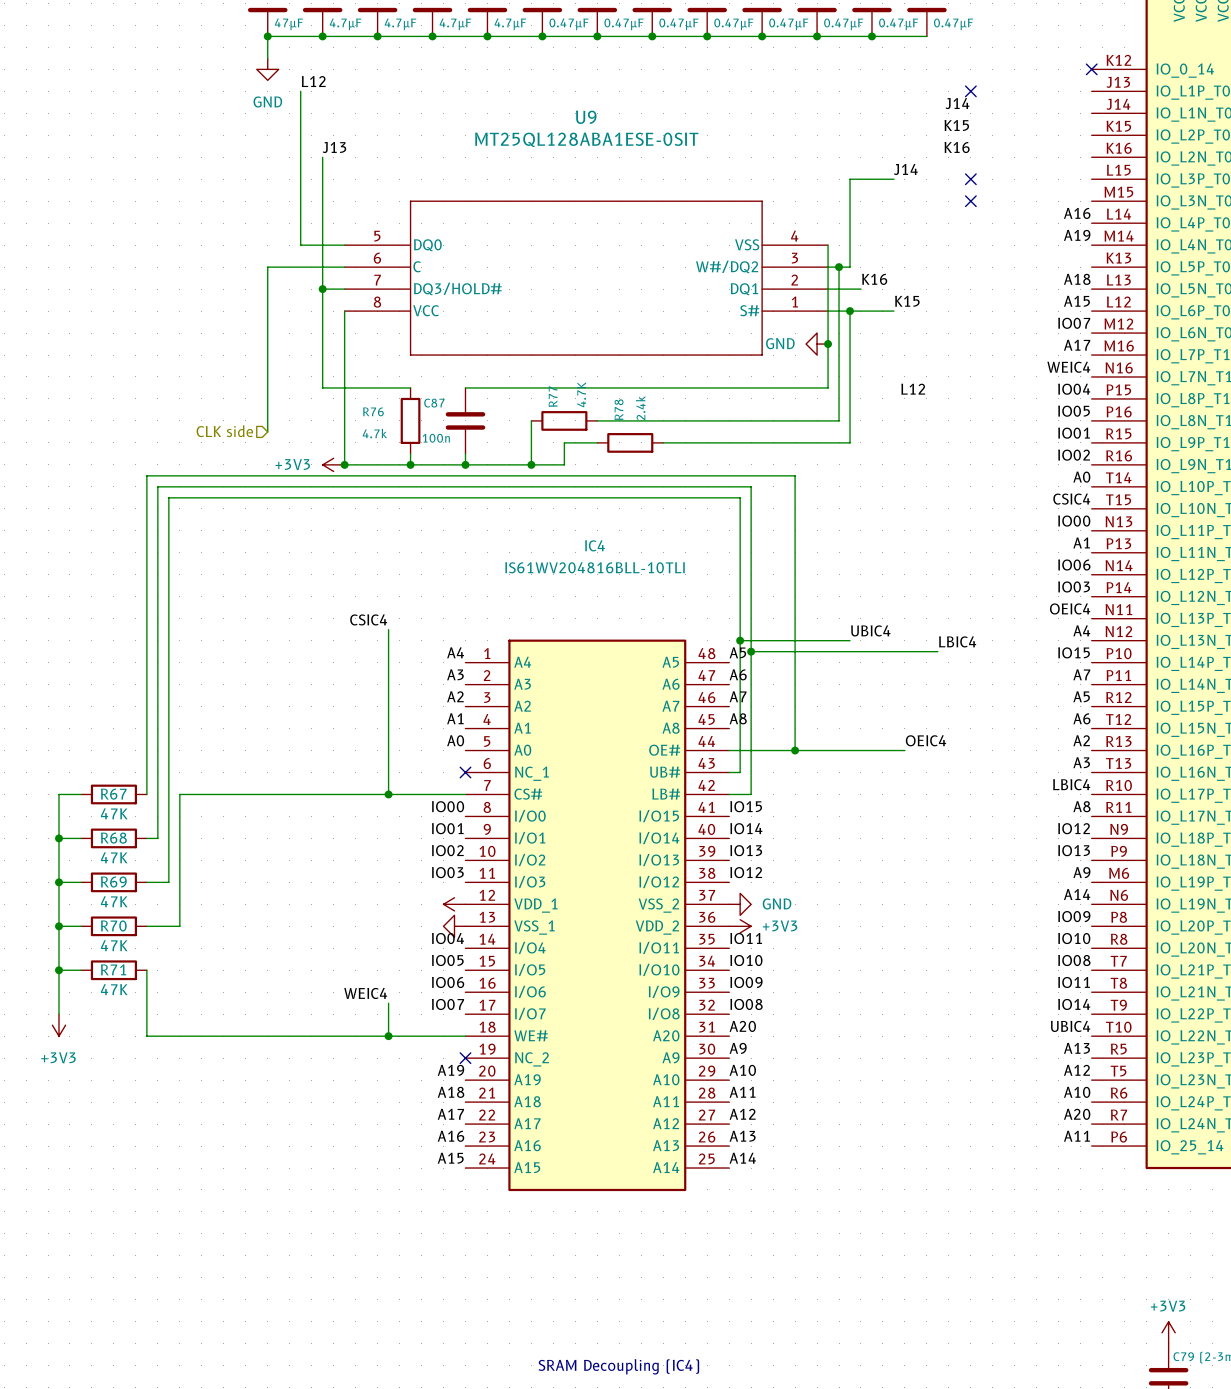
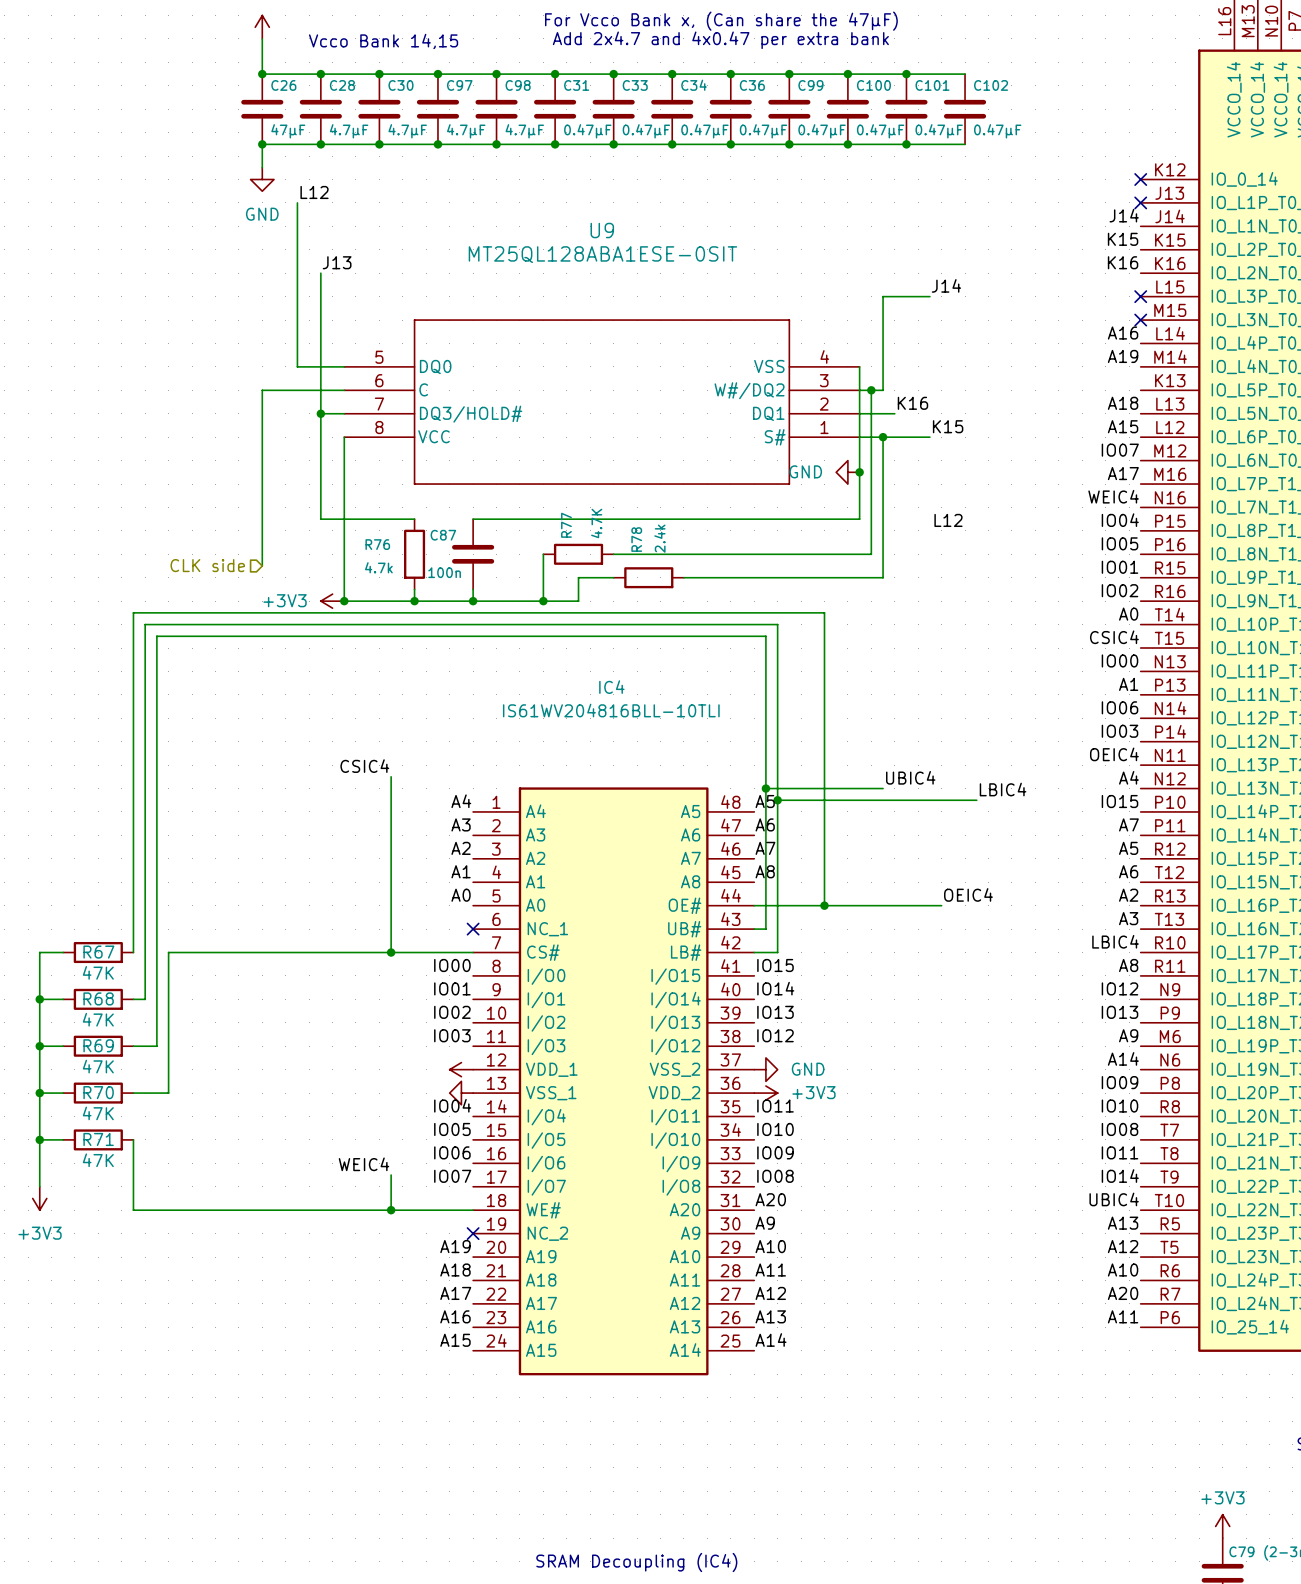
no-connect mark: (970, 91) -> none
no-connect mark: none -> (1140, 202)
label position: J14 (957, 103) -> J14 (1124, 215)
label position: K15 (956, 125) -> K15 (1123, 239)
label position: K16 (957, 147) -> K16 (1123, 262)
no-connect mark: (970, 179) -> none
no-connect mark: none -> (1140, 296)
no-connect mark: (970, 201) -> none
no-connect mark: none -> (1140, 320)

